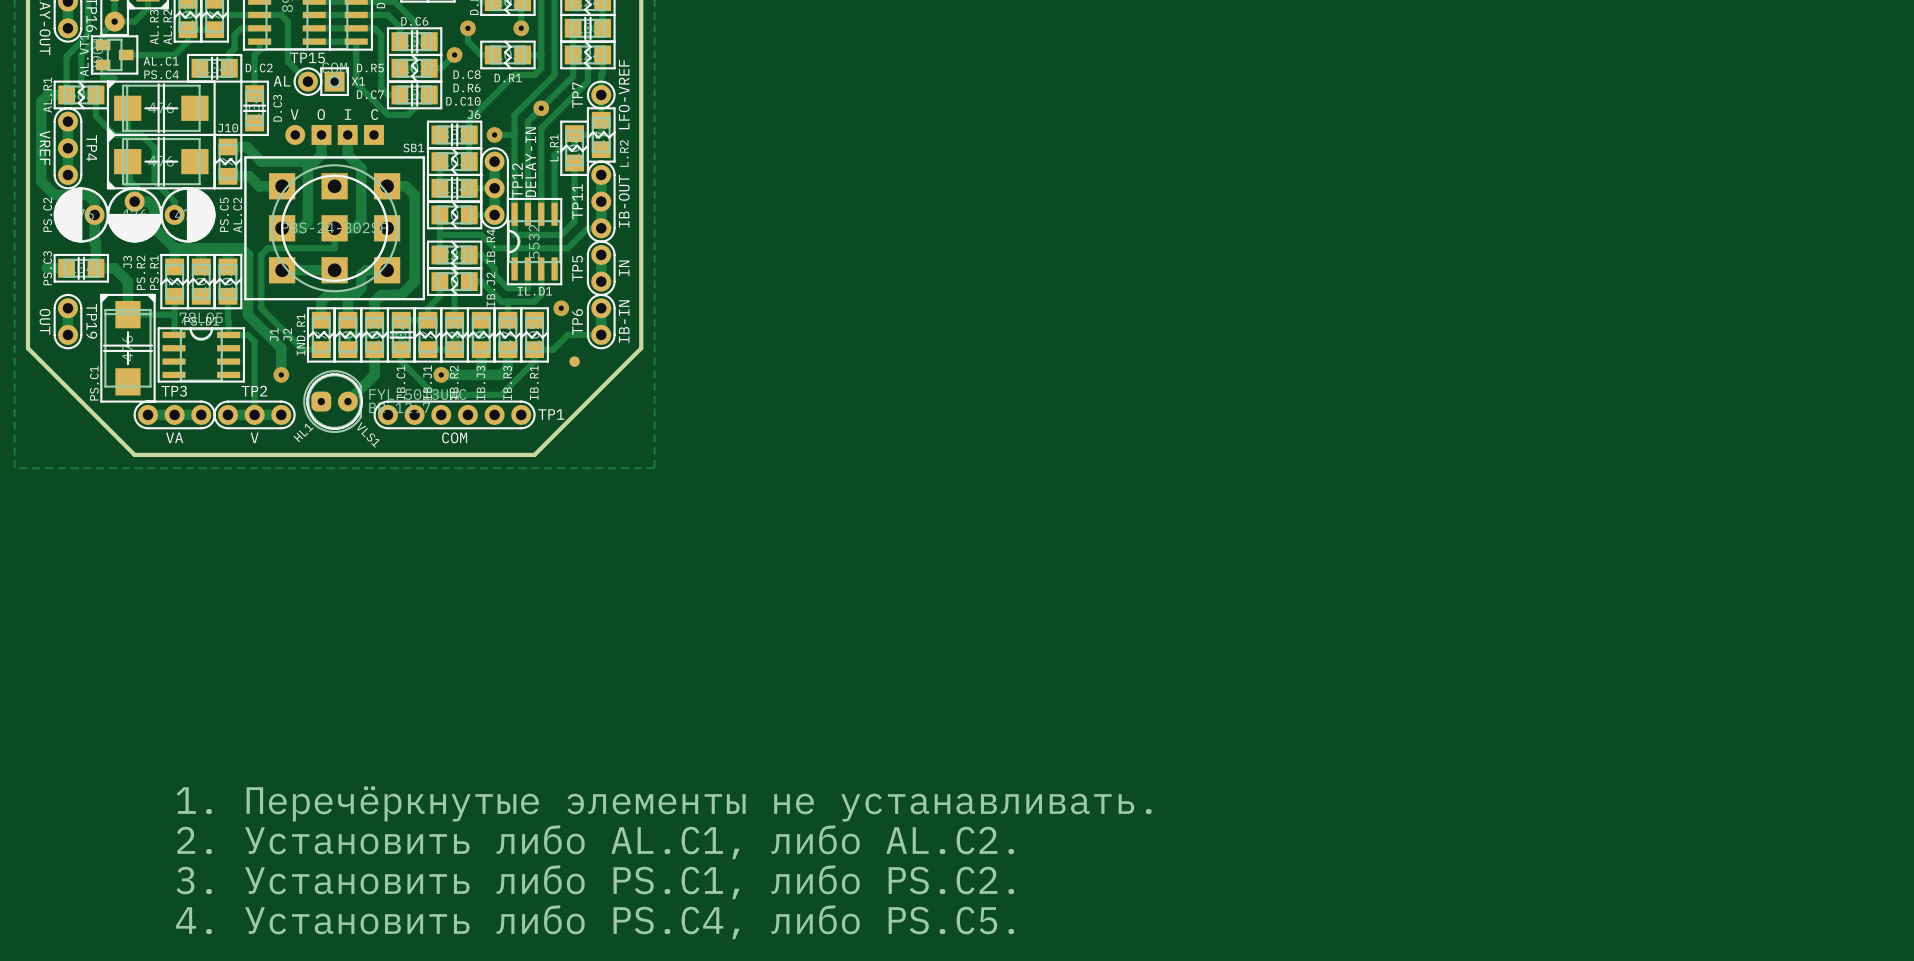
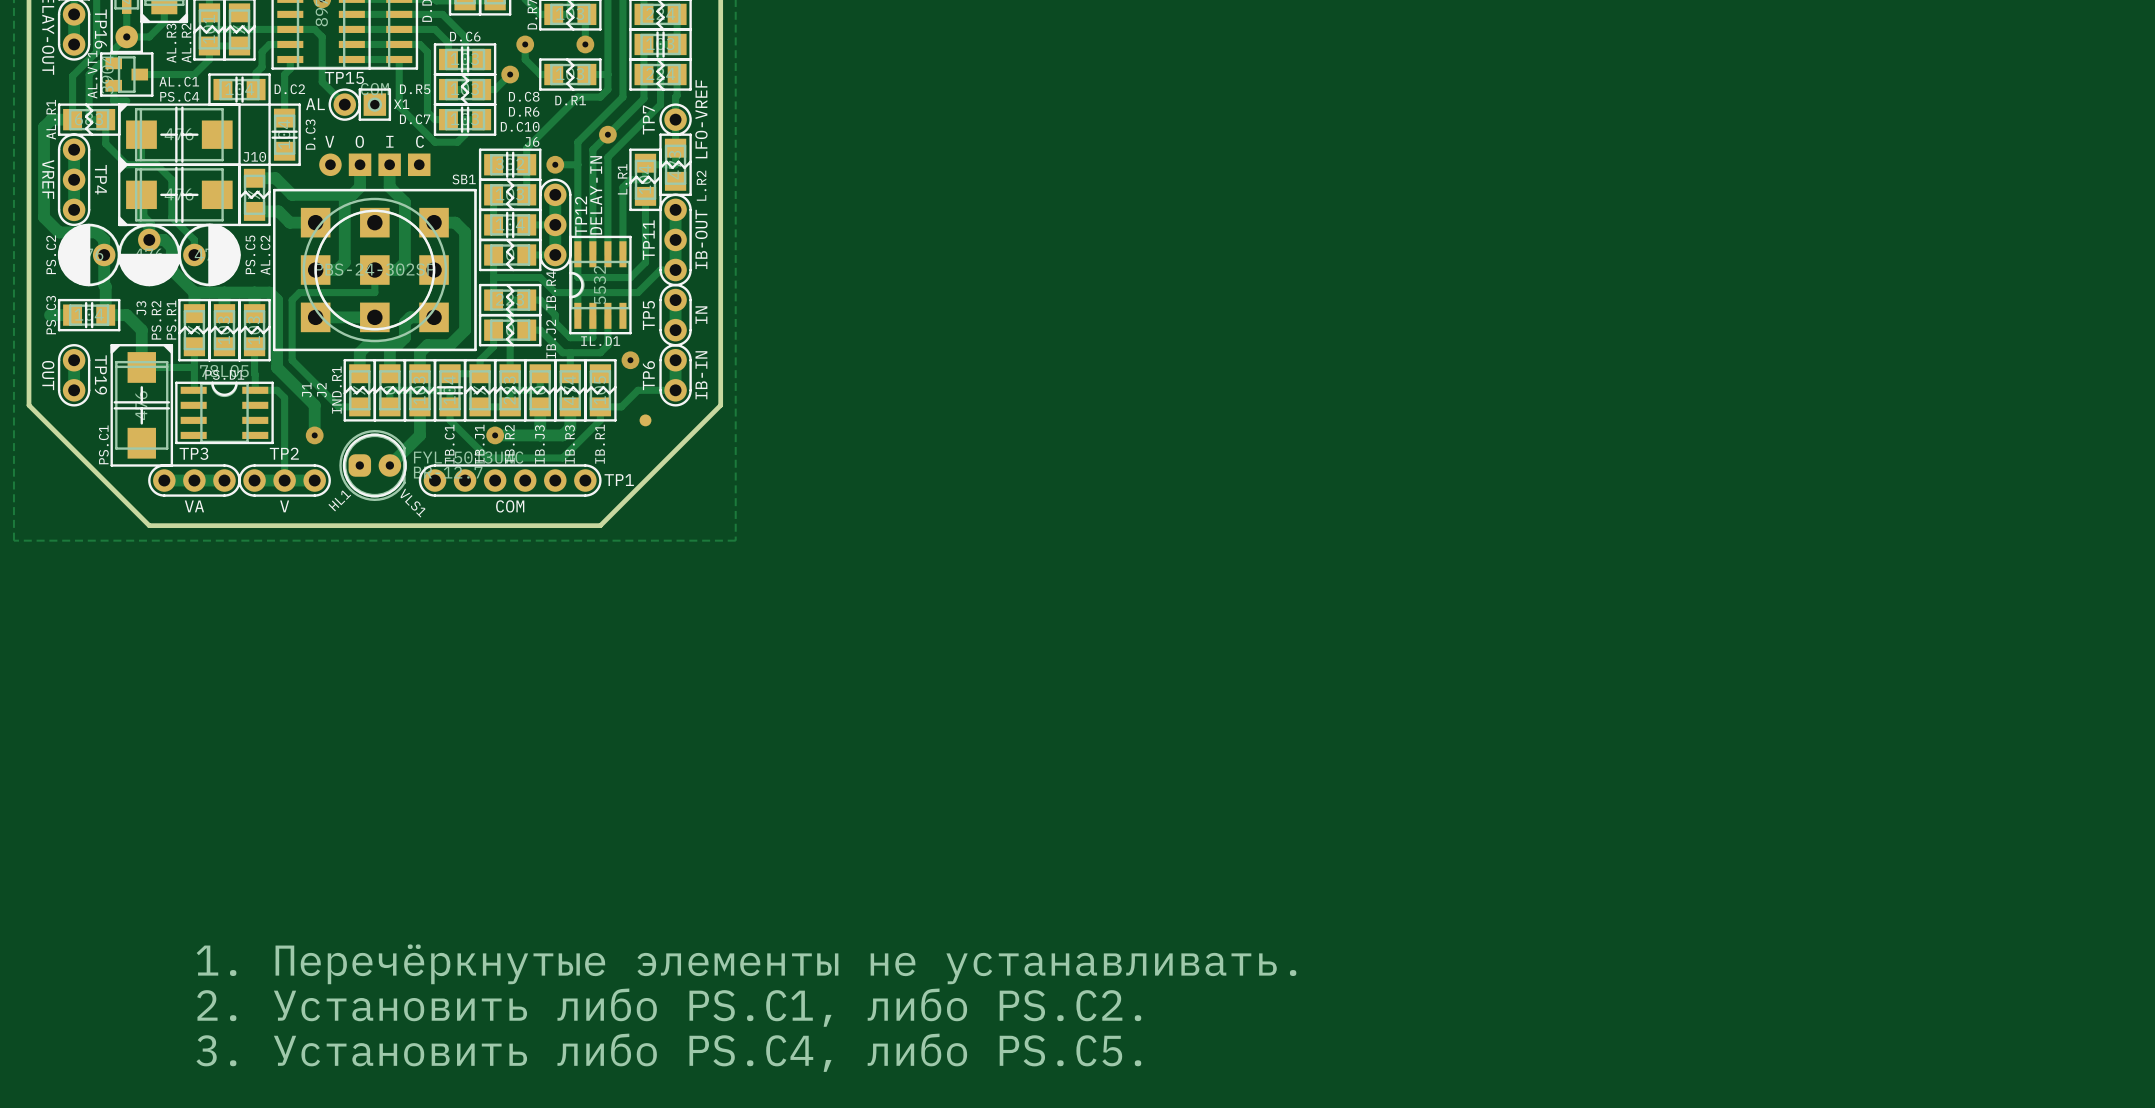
text: 1. Перечёркнутые элементы не устанавливать. (664, 803) -> none
text: 2. Установить либо AL.C1, либо AL.C2. (595, 842) -> 1. Перечёркнутые элементы не устанавливать. (746, 964)
text: 3. Установить либо PS.C1, либо PS.C2. (595, 882) -> 2. Установить либо PS.C1, либо PS.C2. (669, 1007)
text: 4. Установить либо PS.C4, либо PS.C5. (595, 922) -> 3. Установить либо PS.C4, либо PS.C5. (668, 1052)

